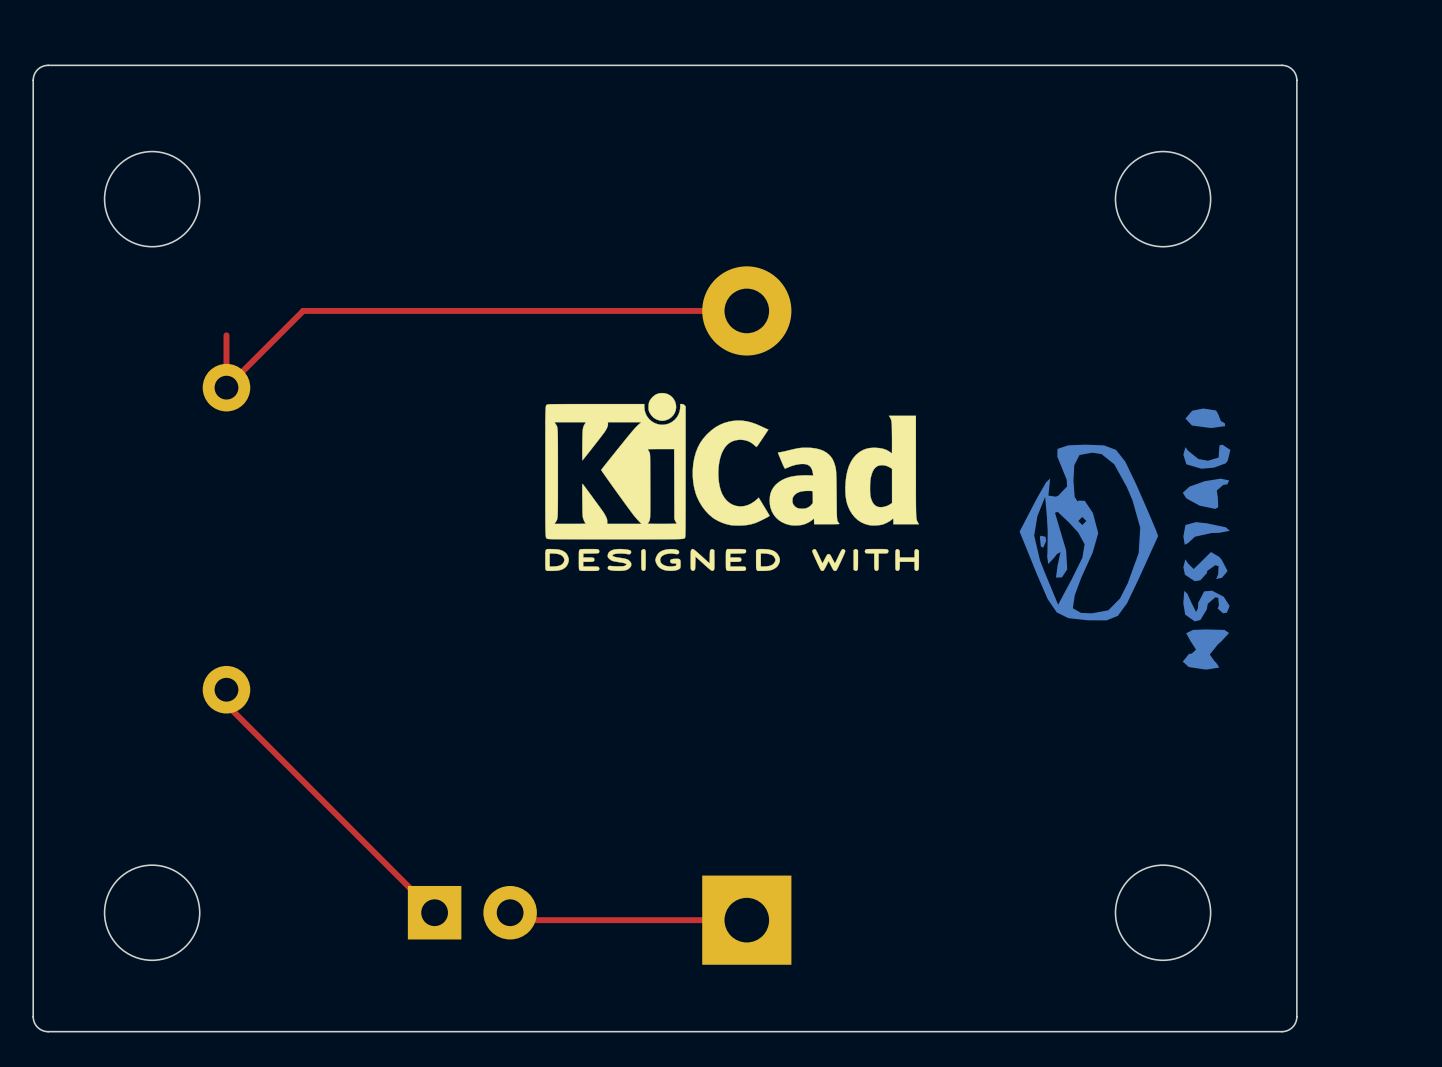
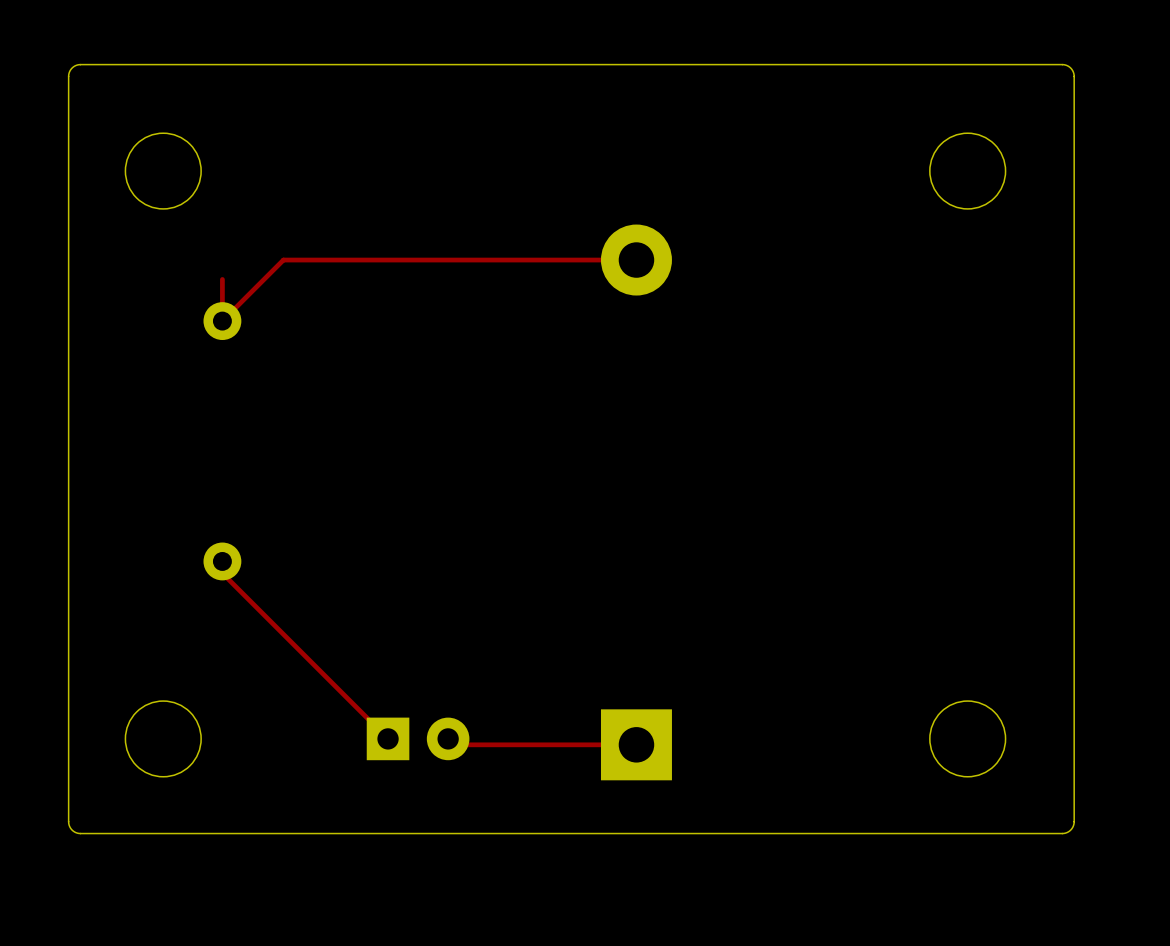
drawing: [545, 392, 920, 572] -> none
drawing: [1019, 408, 1231, 670] -> none

